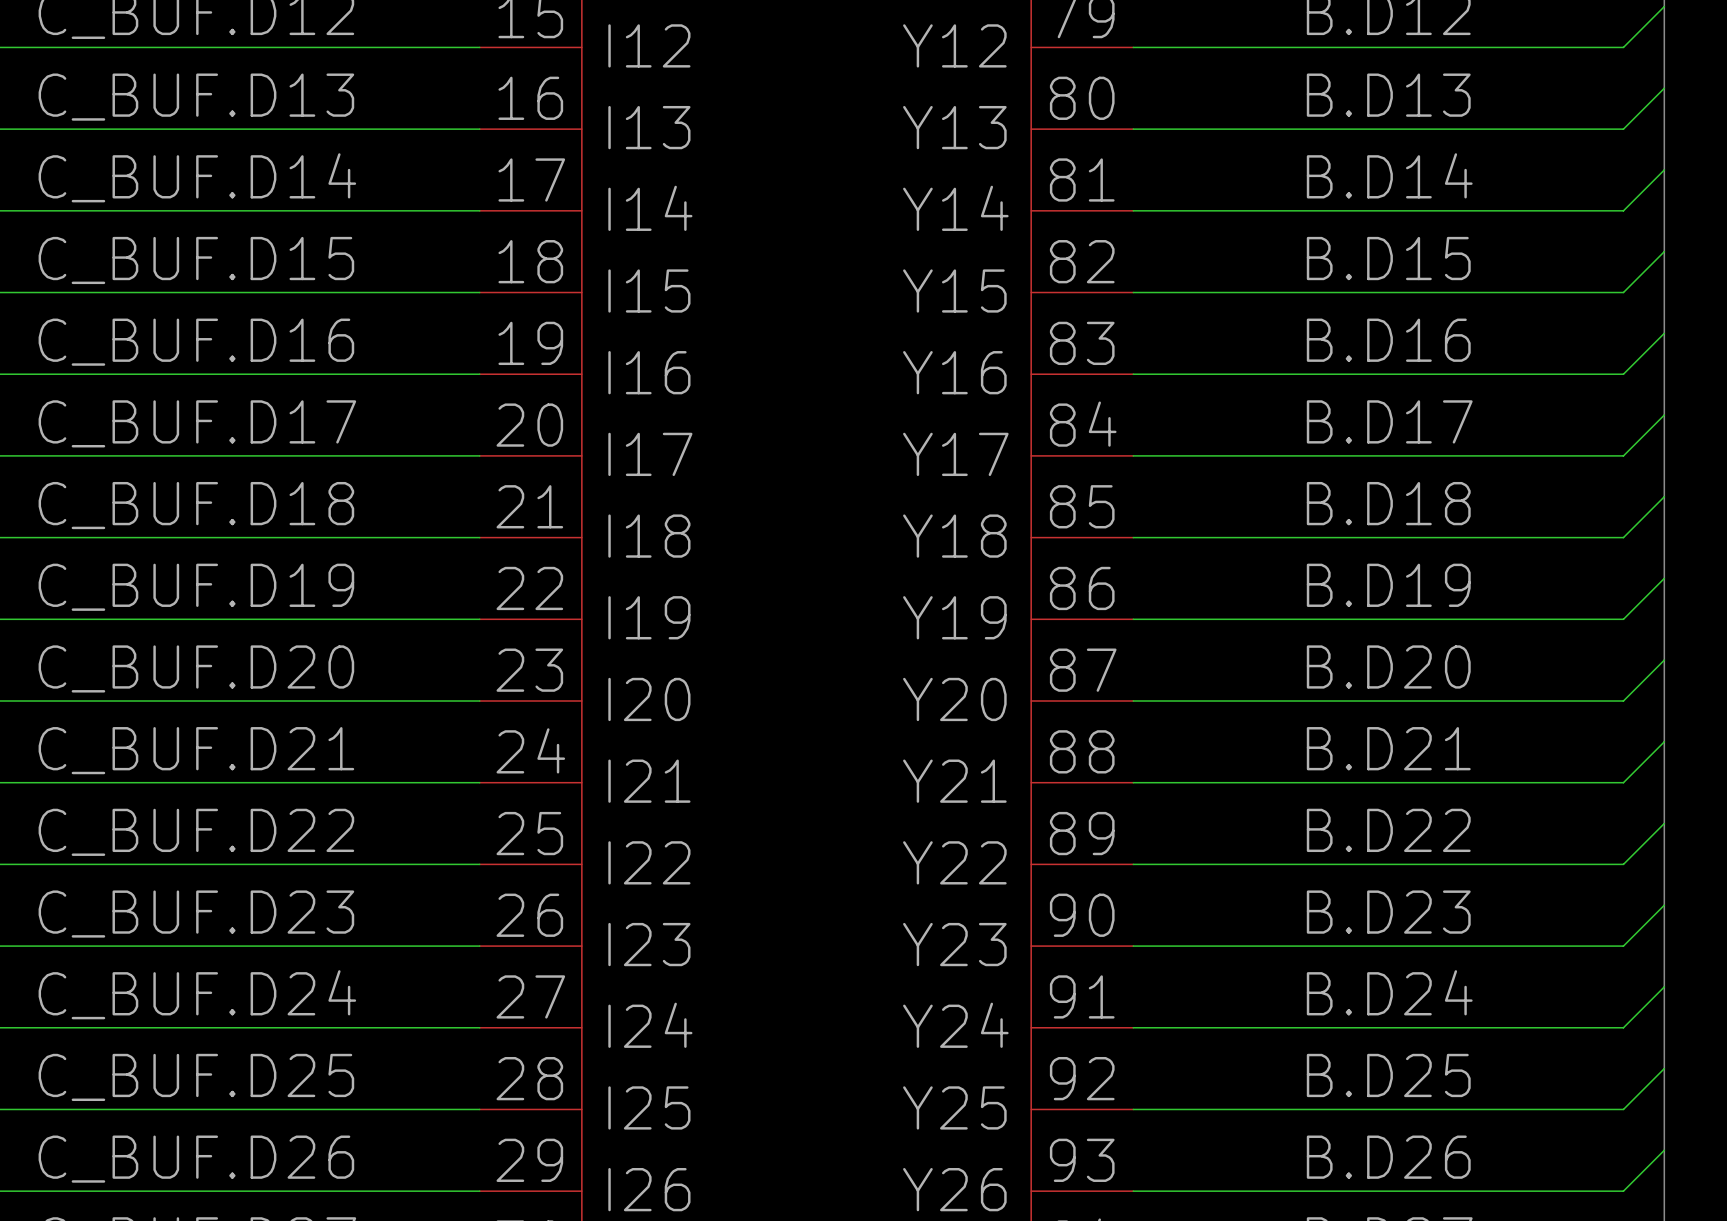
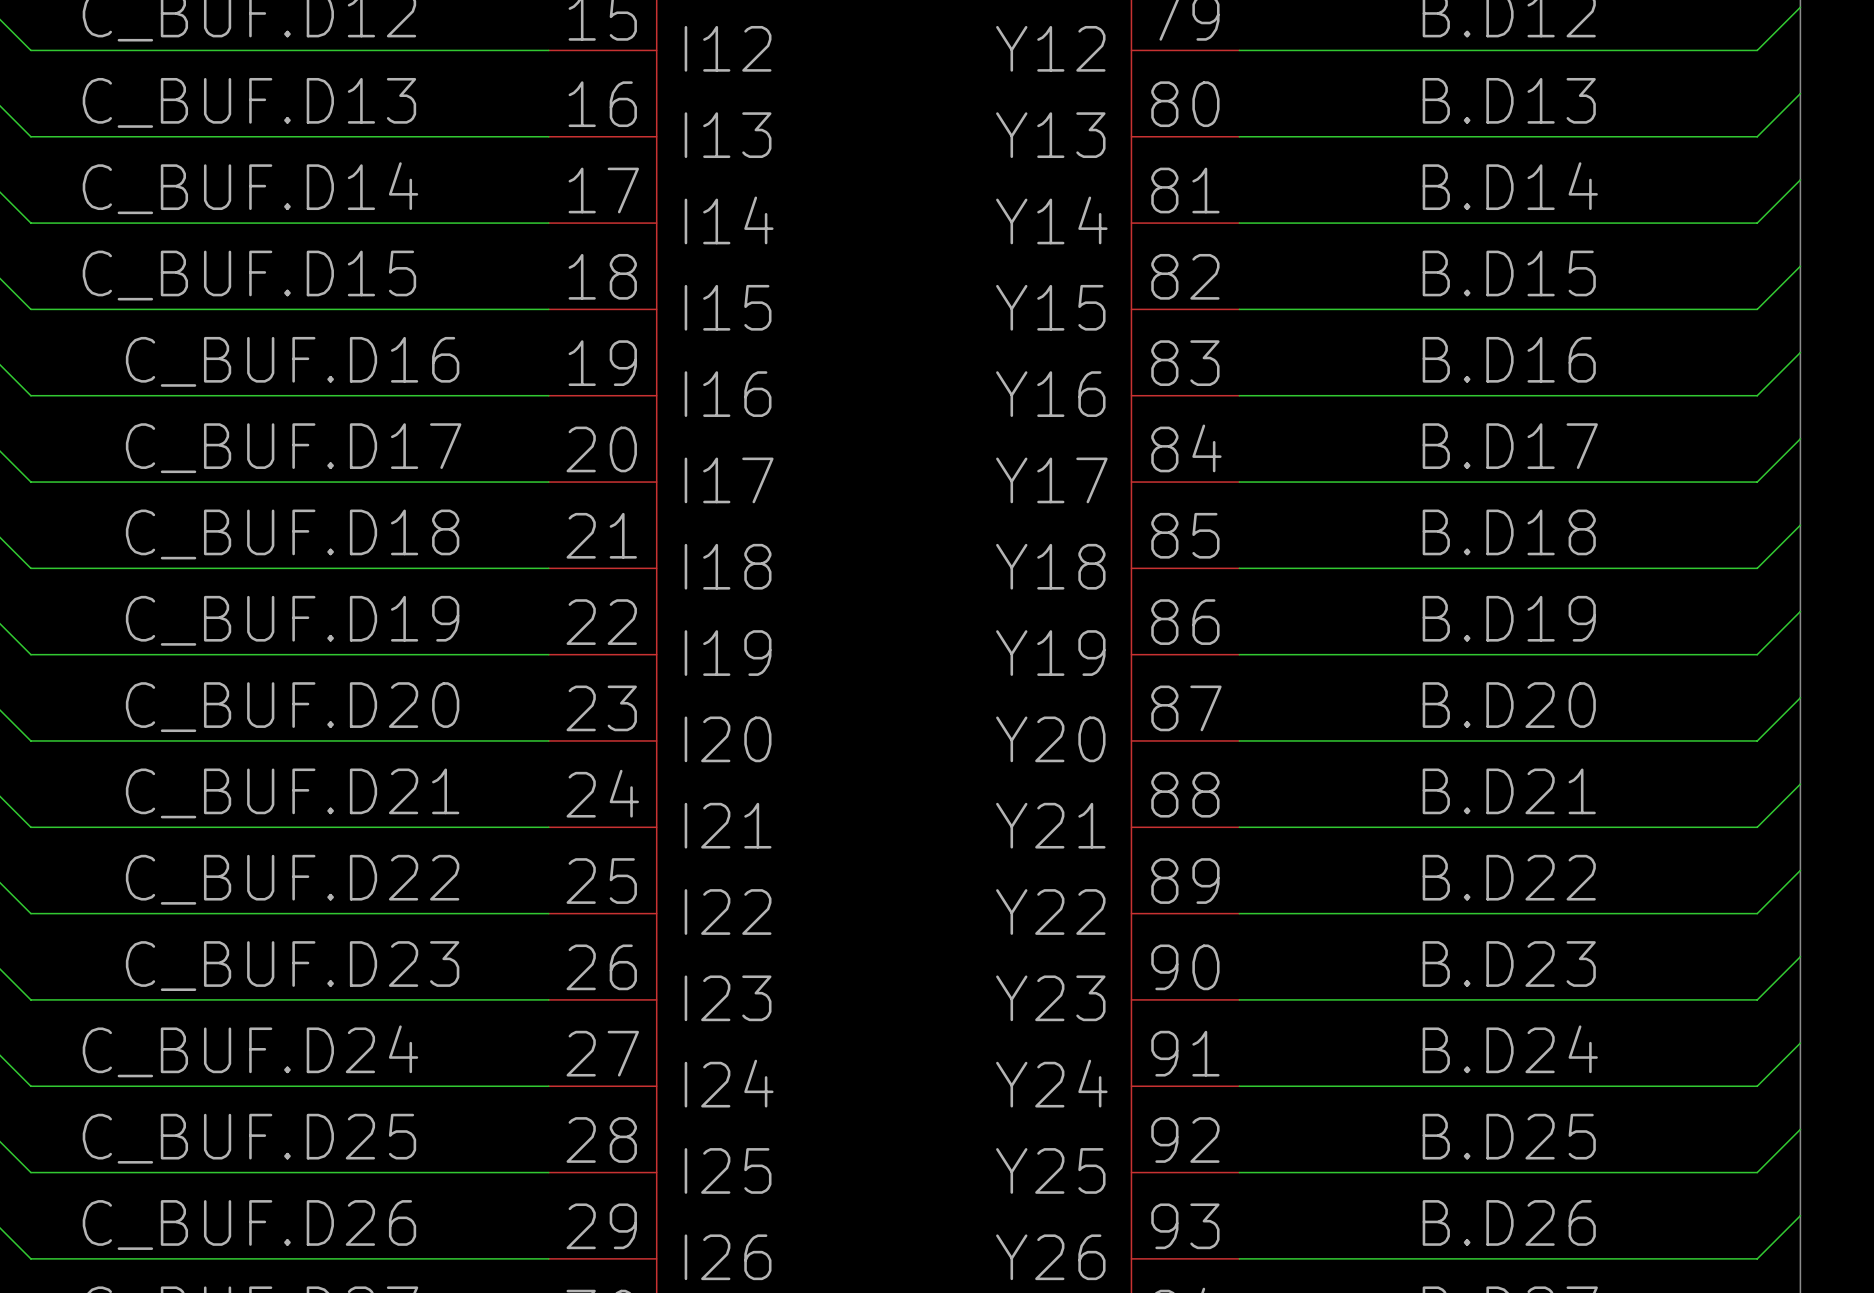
label position: C_BUF.D16 (196, 342) -> C_BUF.D16 (292, 361)
label position: C_BUF.D17 (197, 423) -> C_BUF.D17 (293, 448)
label position: C_BUF.D18 (196, 505) -> C_BUF.D18 (292, 534)
label position: C_BUF.D19 (196, 587) -> C_BUF.D19 (292, 620)
label position: C_BUF.D20 (196, 668) -> C_BUF.D20 (292, 707)
label position: C_BUF.D21 (196, 750) -> C_BUF.D21 (292, 793)
label position: C_BUF.D22 (196, 832) -> C_BUF.D22 (292, 879)
label position: C_BUF.D23 (196, 914) -> C_BUF.D23 (292, 966)

